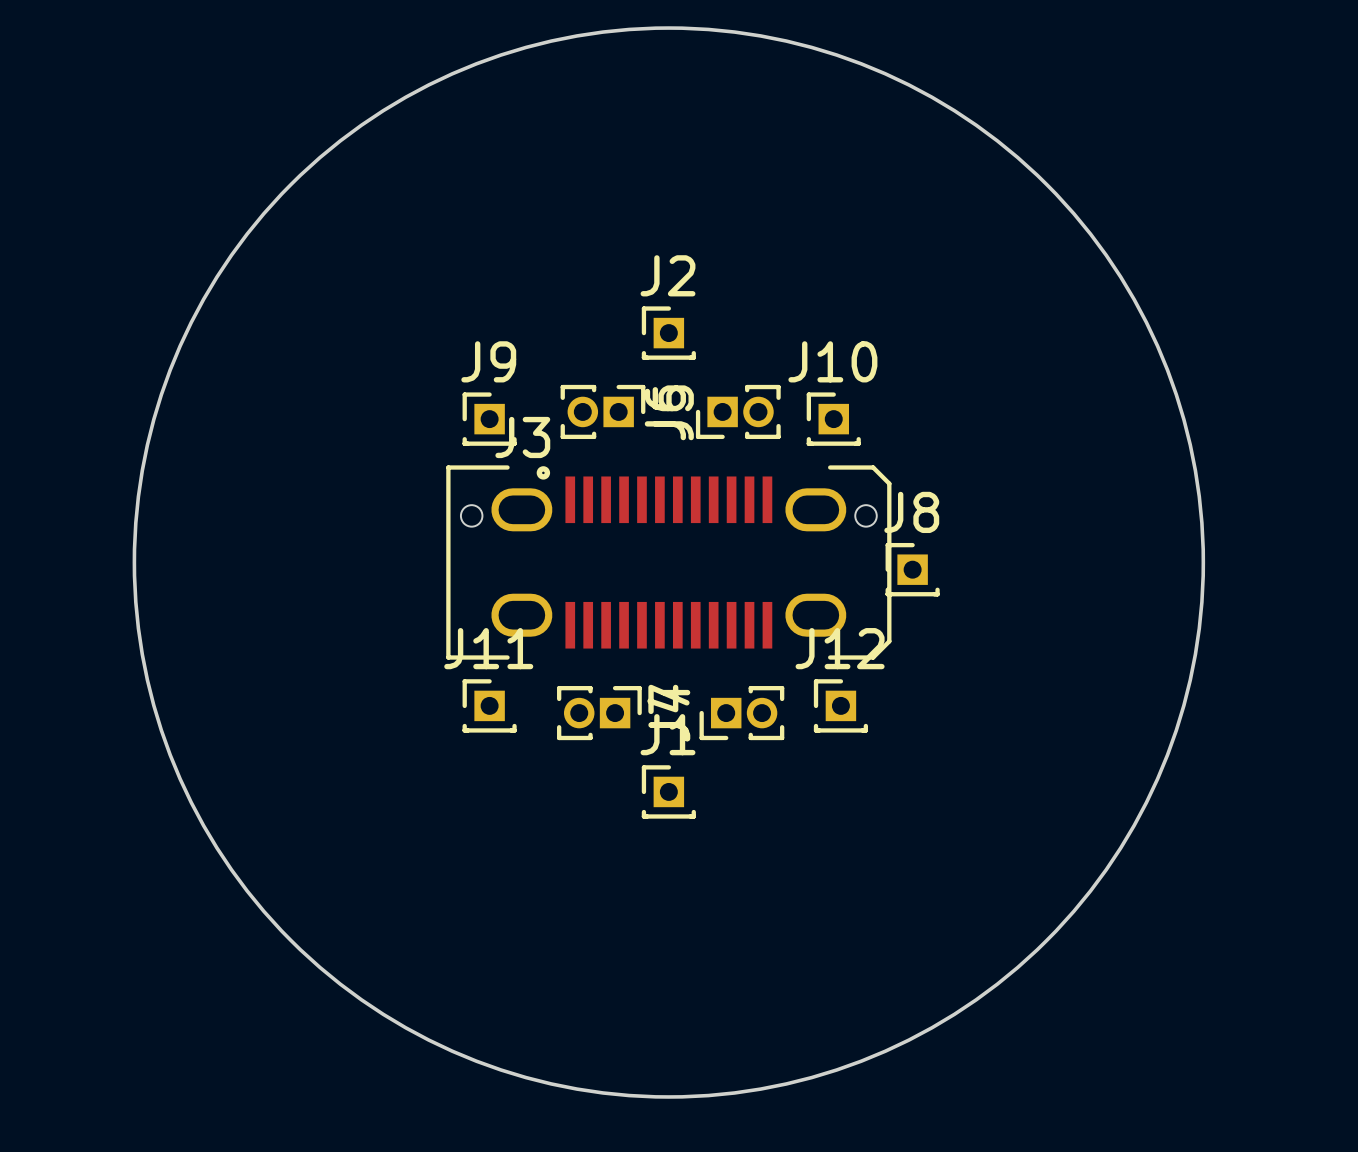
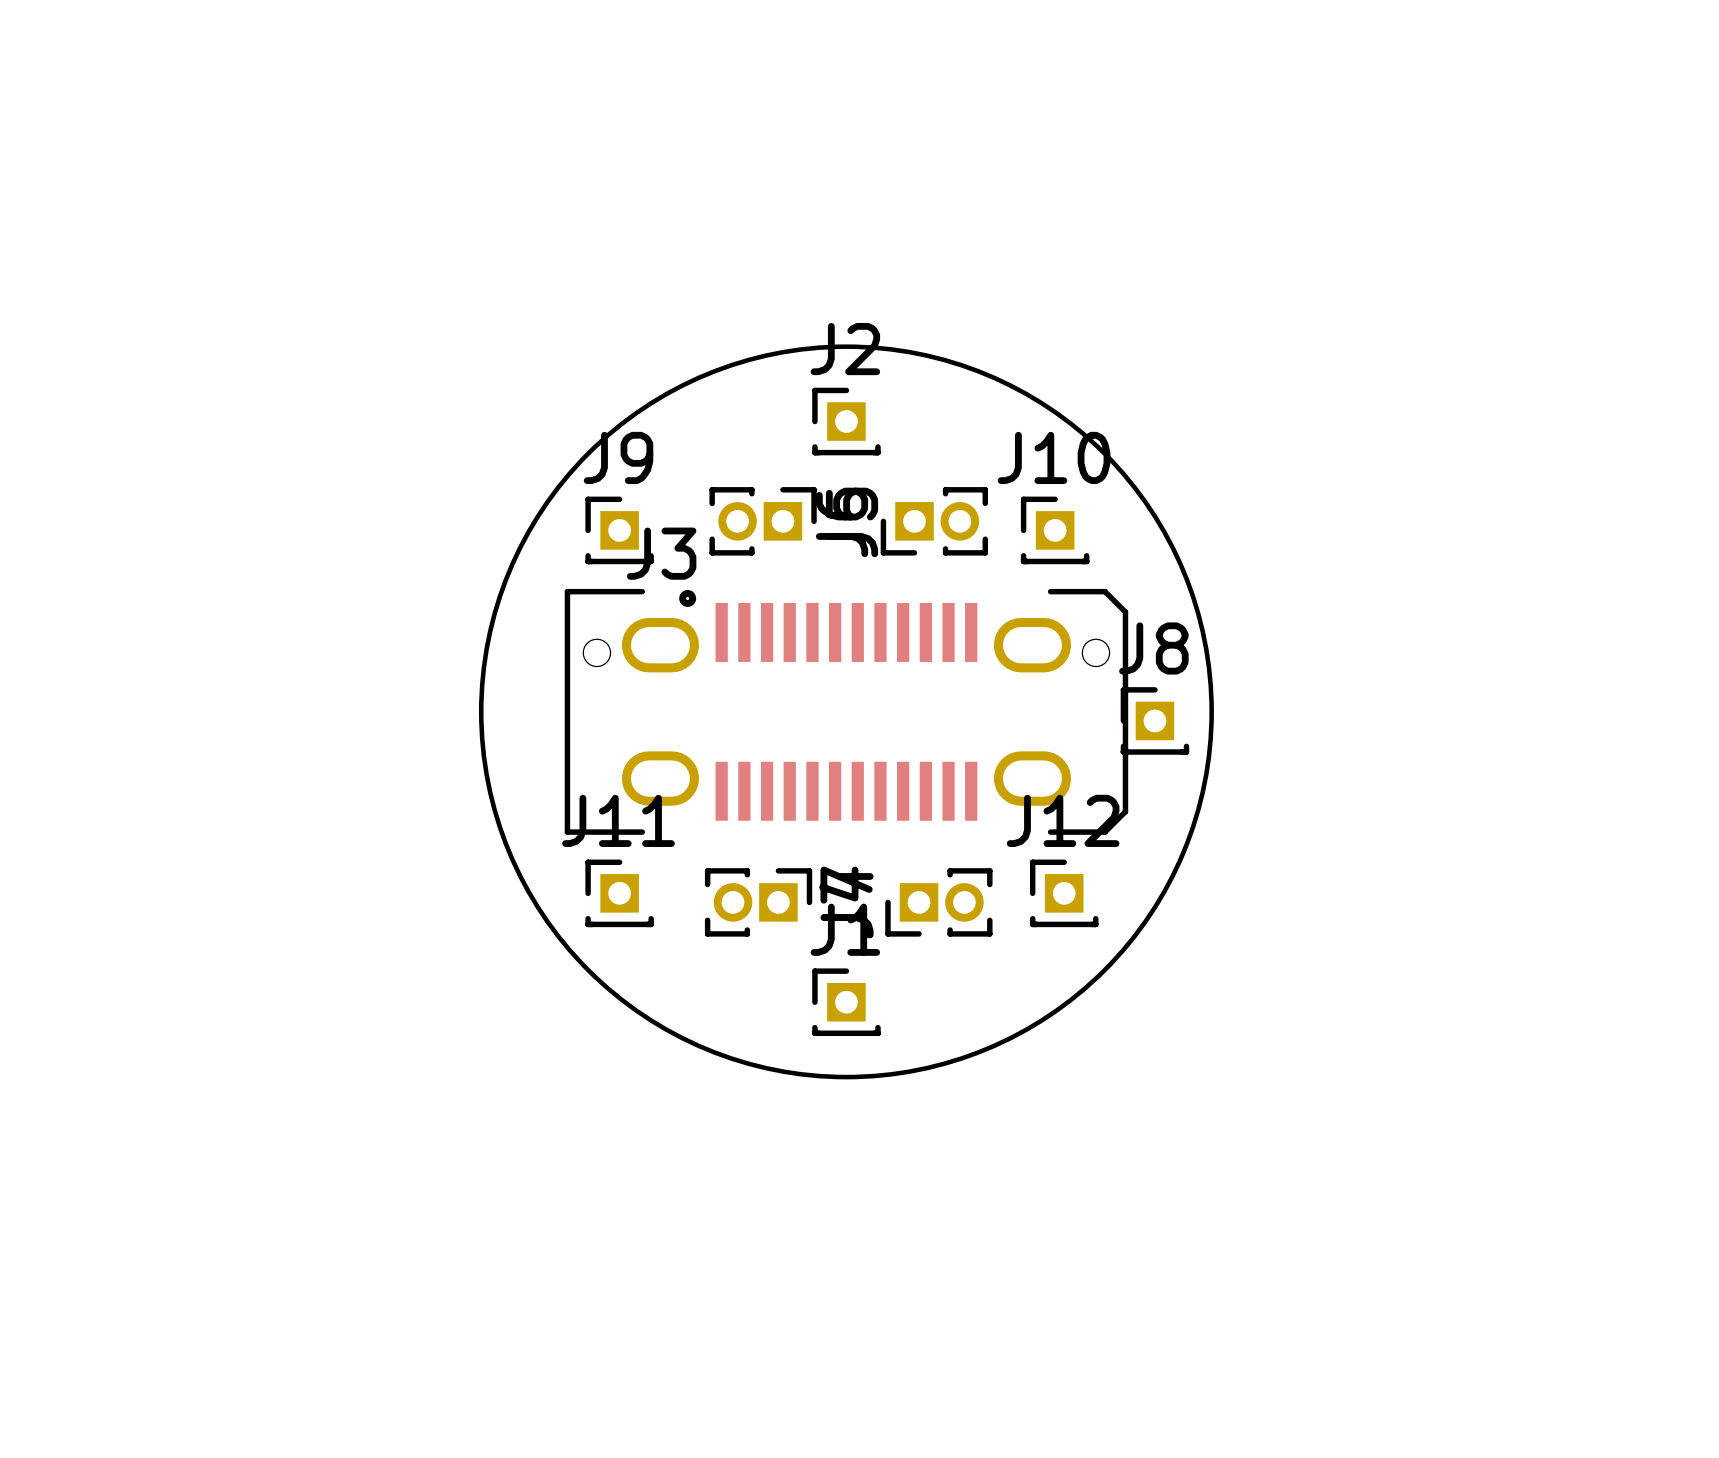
round board edge size: [132, 26, 1206, 1099] -> [478, 344, 1214, 1080]

